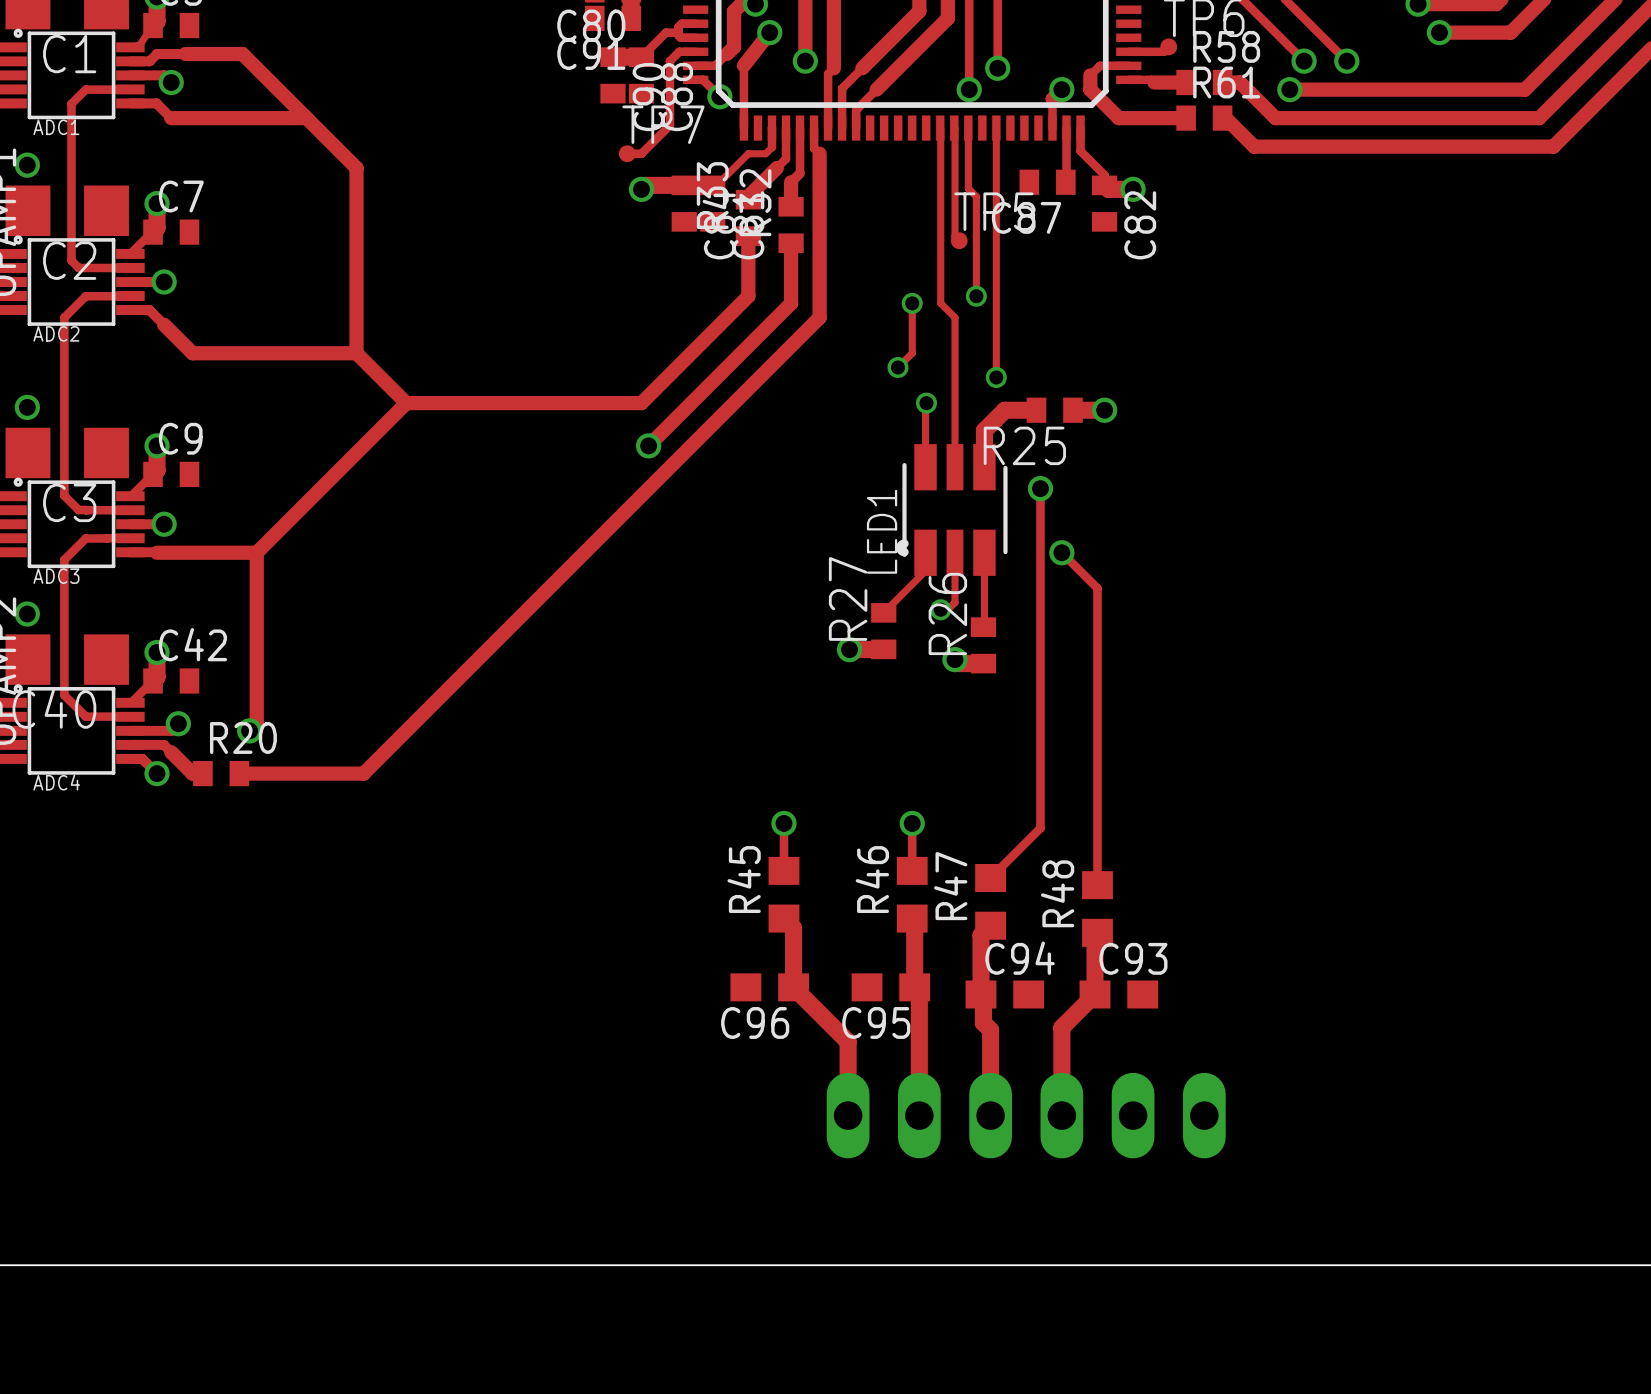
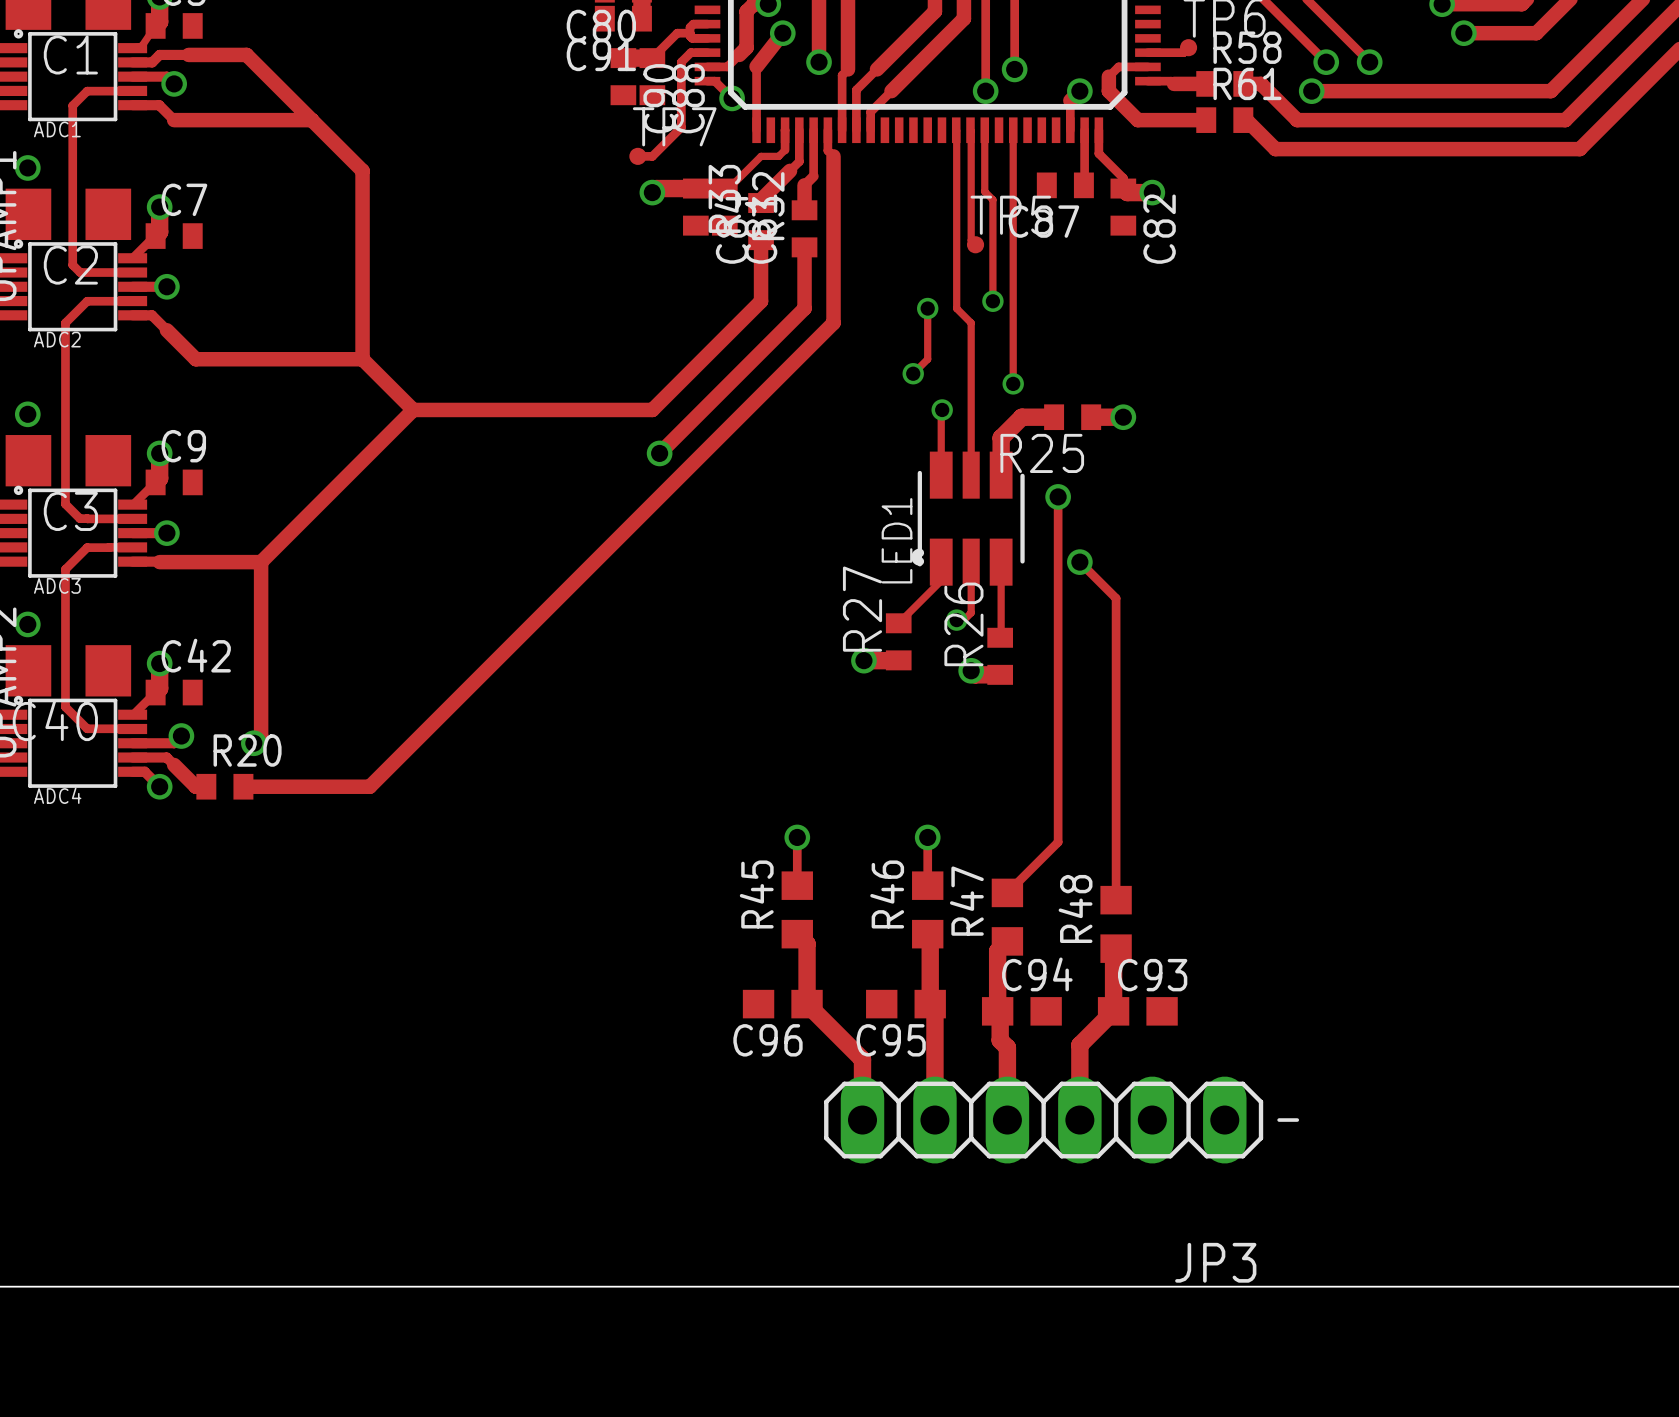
JP3 side: bottom (1026, 1115) -> top (1061, 1120)

